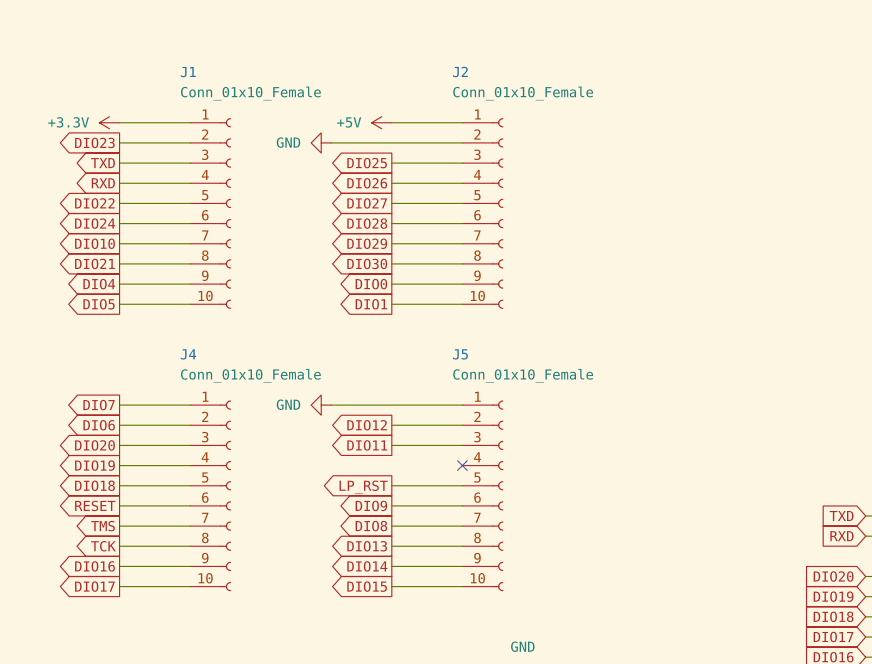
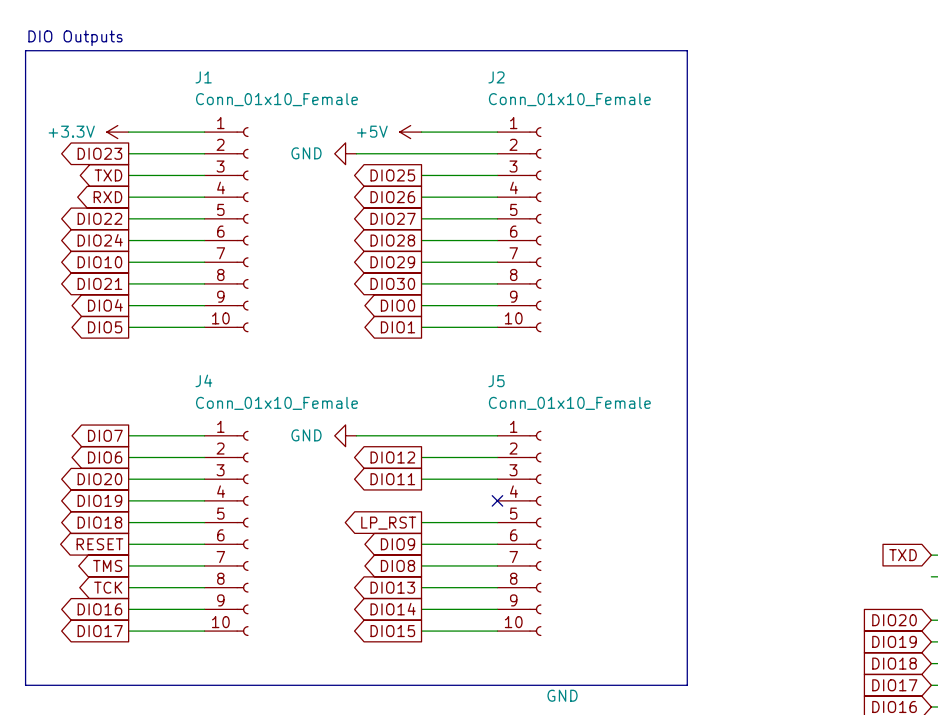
text: none -> DIO Outputs (75, 38)
line: none -> (25, 50) (25, 685) (687, 685) (687, 50) (25, 50)
global label: RXD (841, 536) -> none

